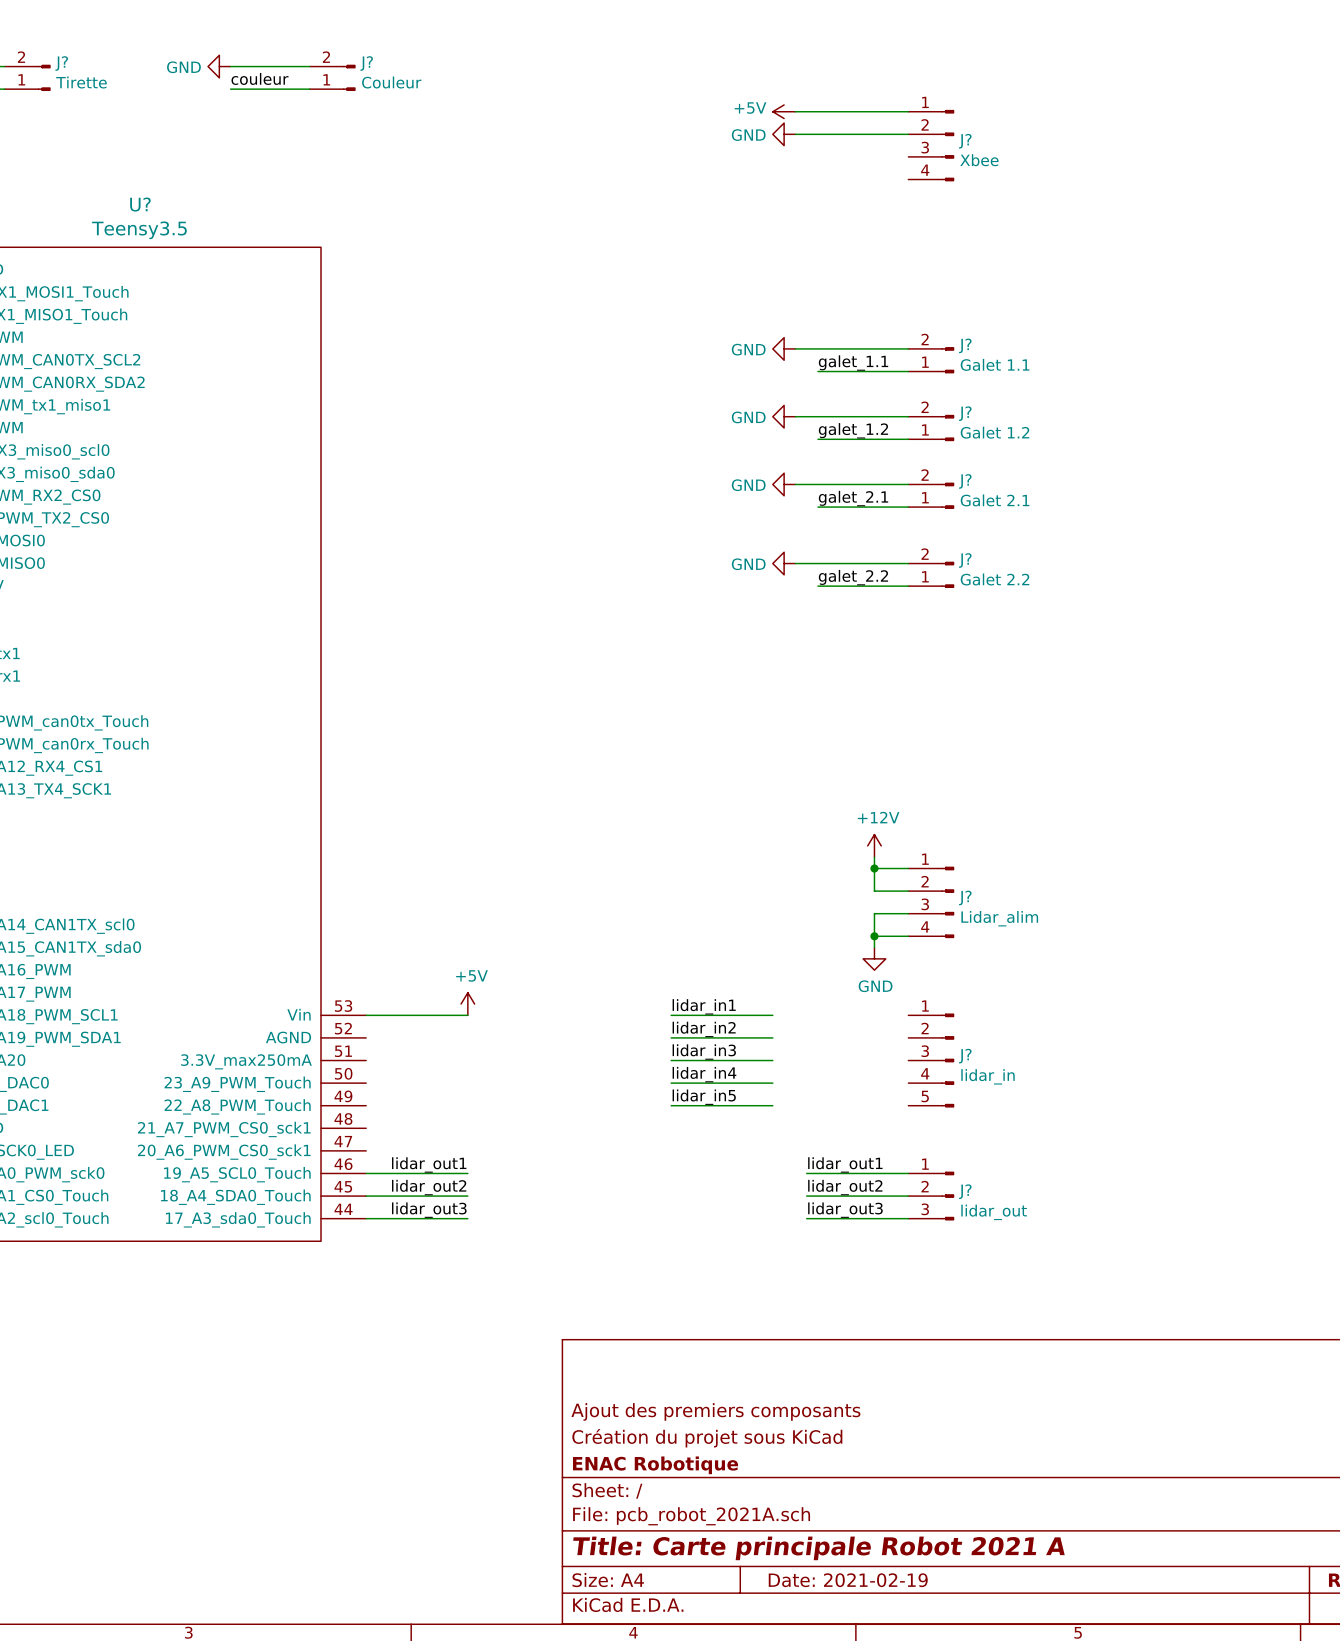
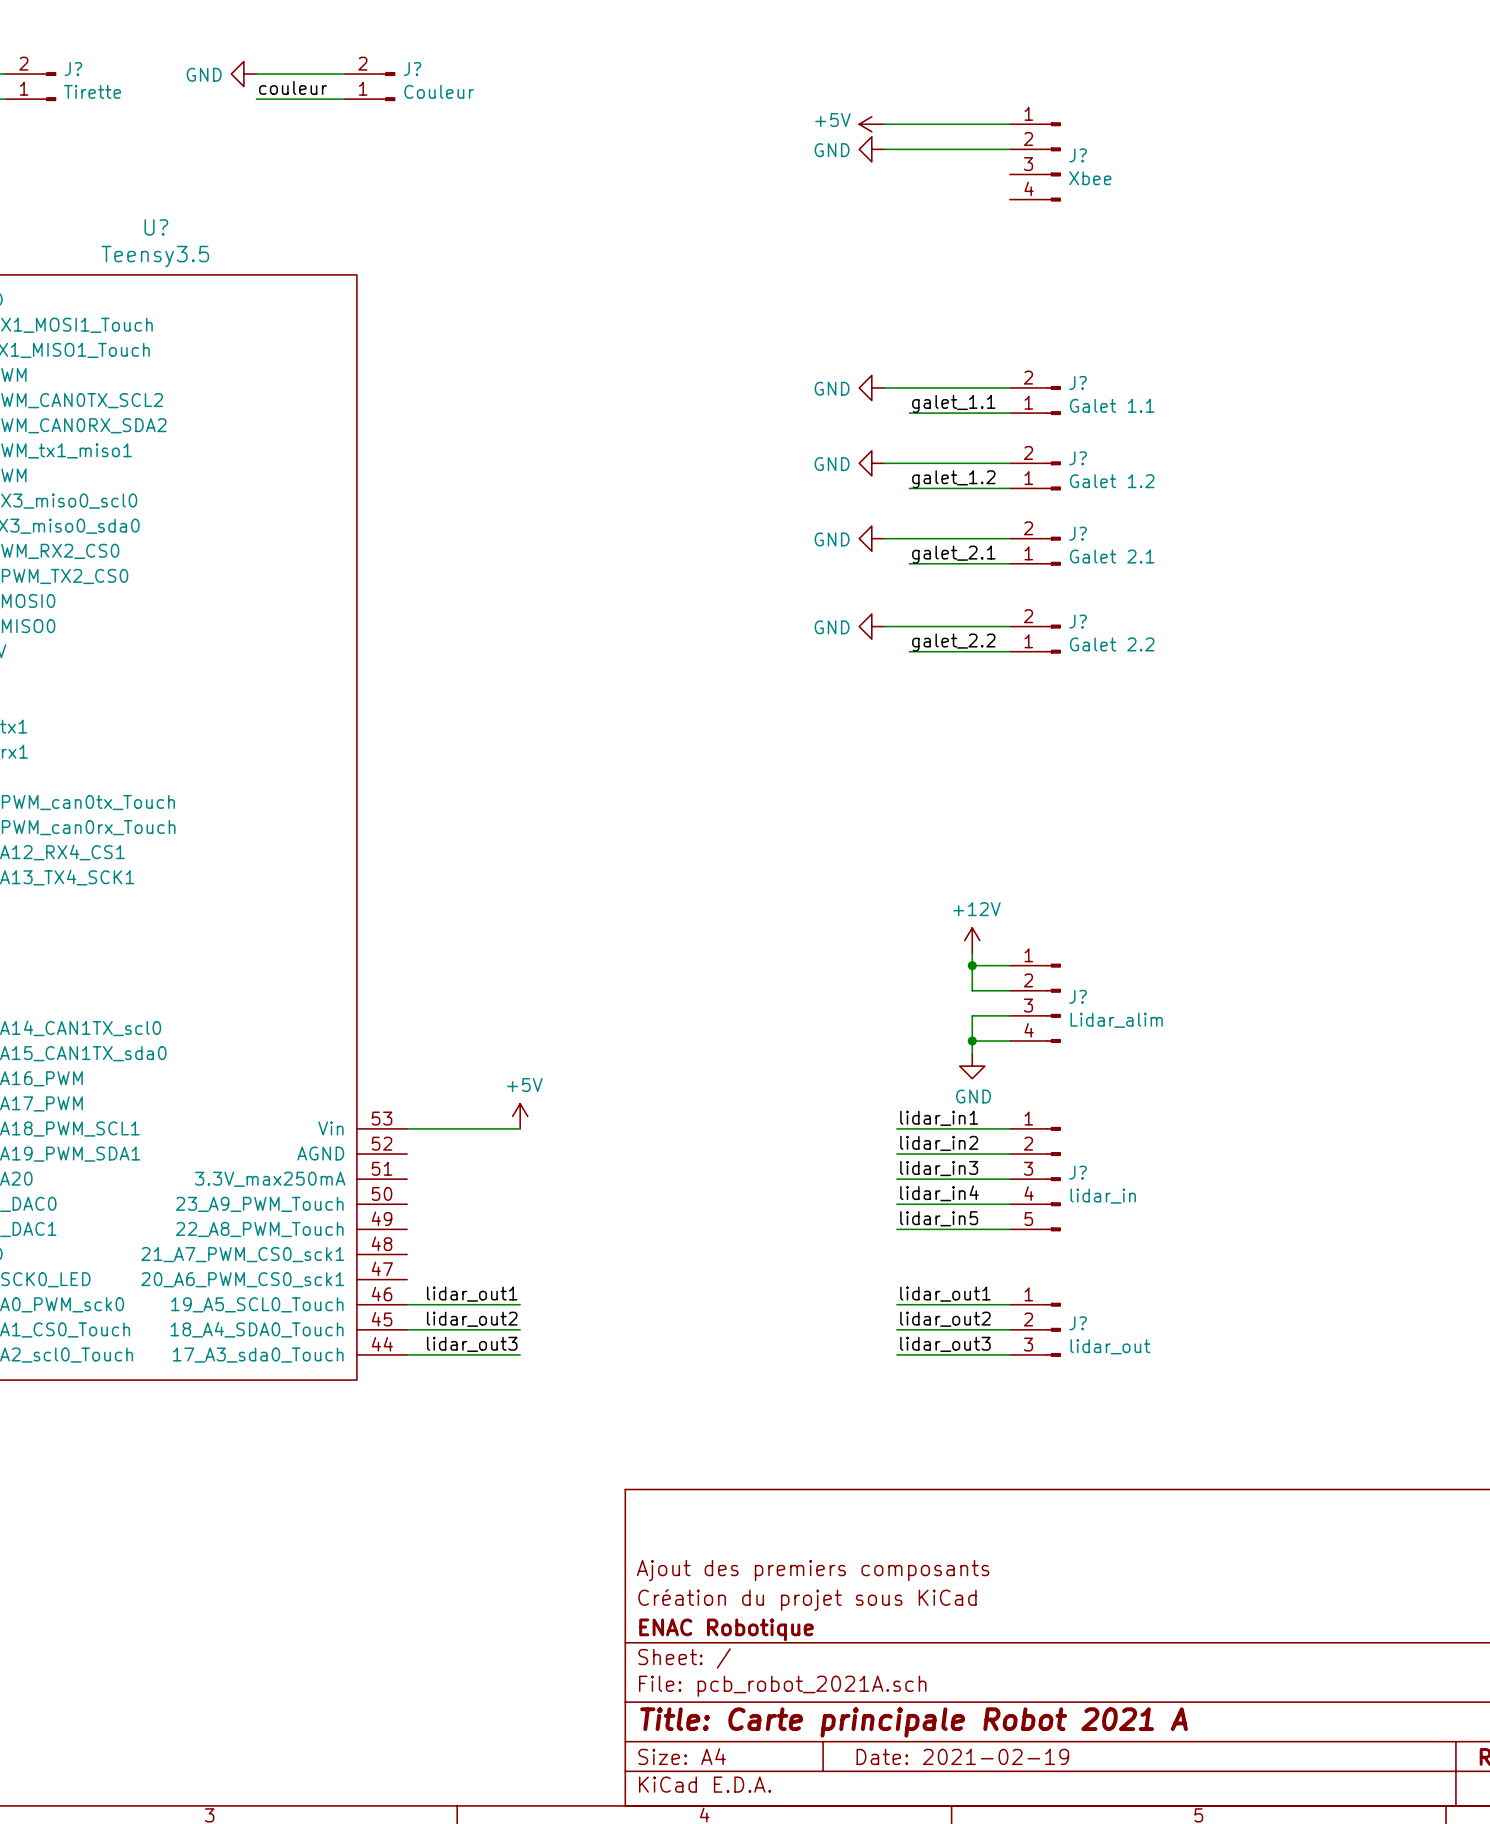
label position: lidar_in1 (704, 1006) -> lidar_in1 (939, 1118)
wire: (671, 1015) (772, 1015) -> (896, 1128) (1009, 1128)
label position: lidar_in2 (704, 1029) -> lidar_in2 (939, 1143)
wire: (671, 1037) (772, 1037) -> (896, 1154) (1009, 1154)
label position: lidar_in3 (704, 1052) -> lidar_in3 (939, 1168)
wire: (671, 1060) (772, 1060) -> (896, 1179) (1009, 1179)
label position: lidar_in4 (704, 1074) -> lidar_in4 (939, 1193)
wire: (671, 1083) (772, 1083) -> (896, 1204) (1009, 1204)
label position: lidar_in5 (704, 1097) -> lidar_in5 (939, 1218)
wire: (671, 1105) (772, 1105) -> (896, 1229) (1009, 1229)

